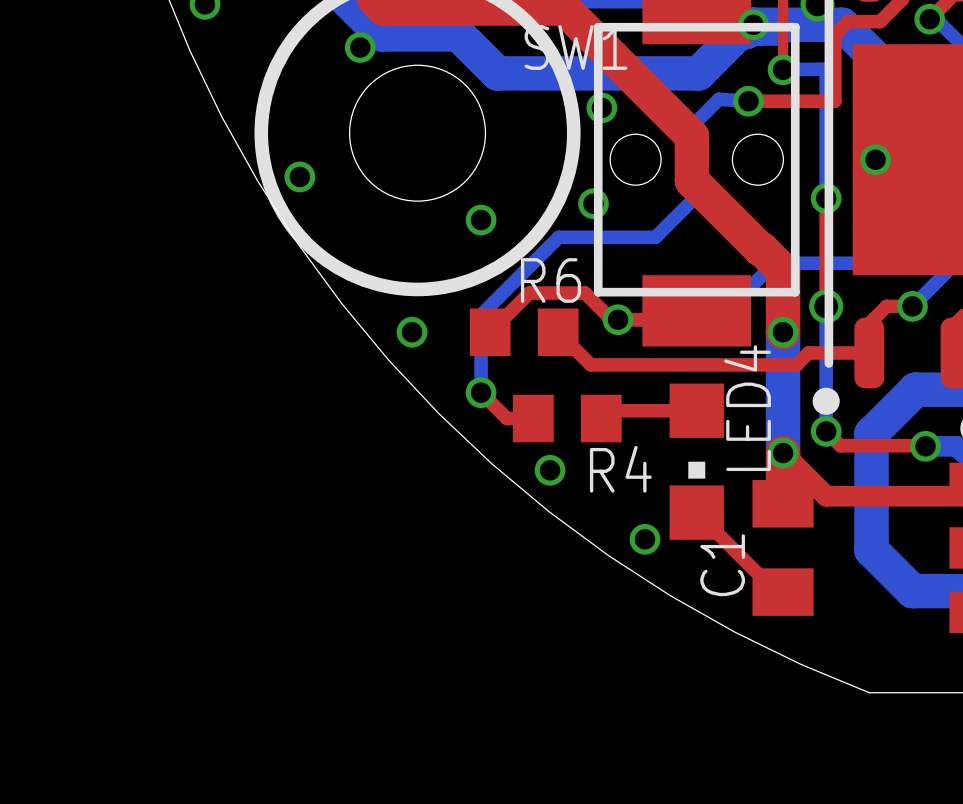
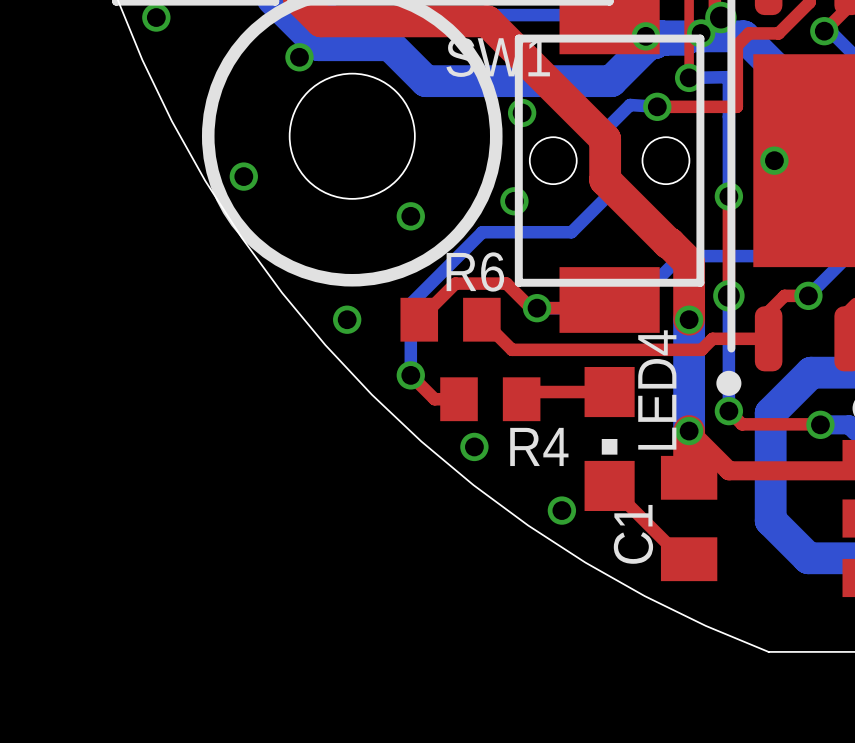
via: none -> (701, 33)
via position: (753, 24) -> (645, 36)

